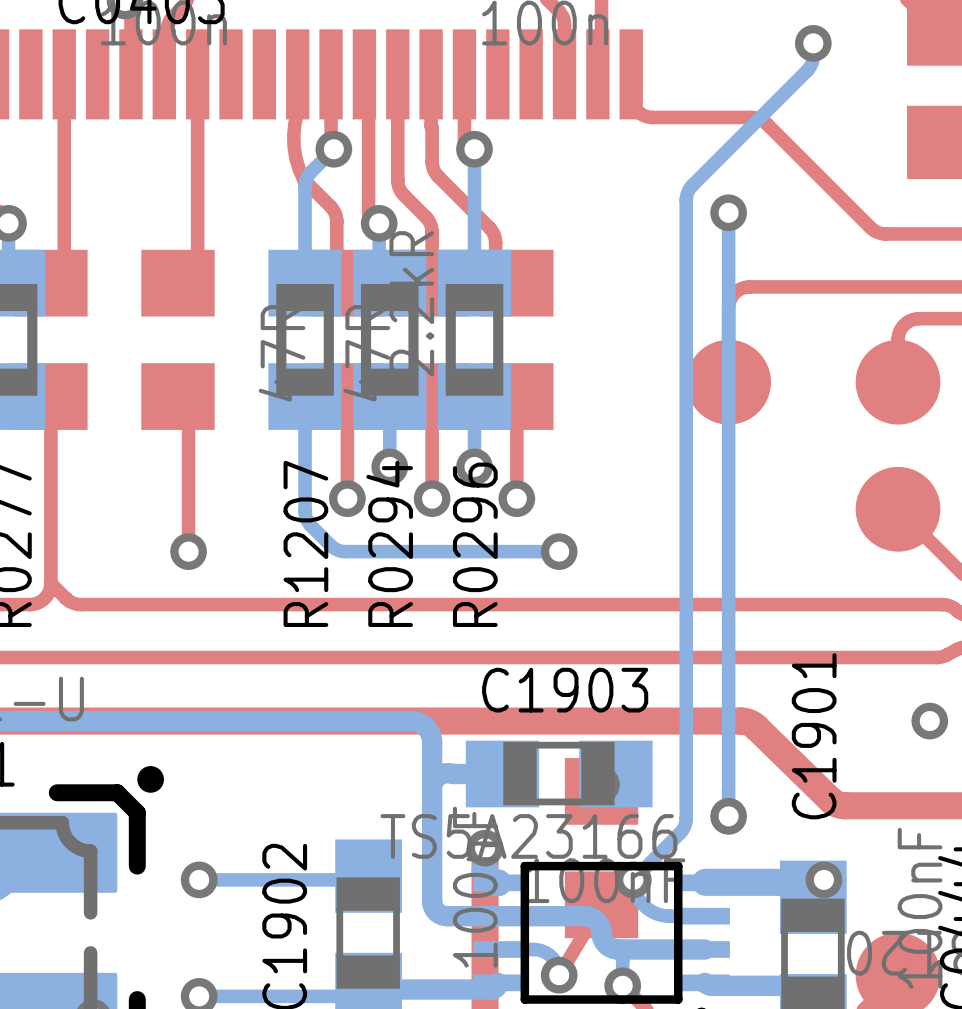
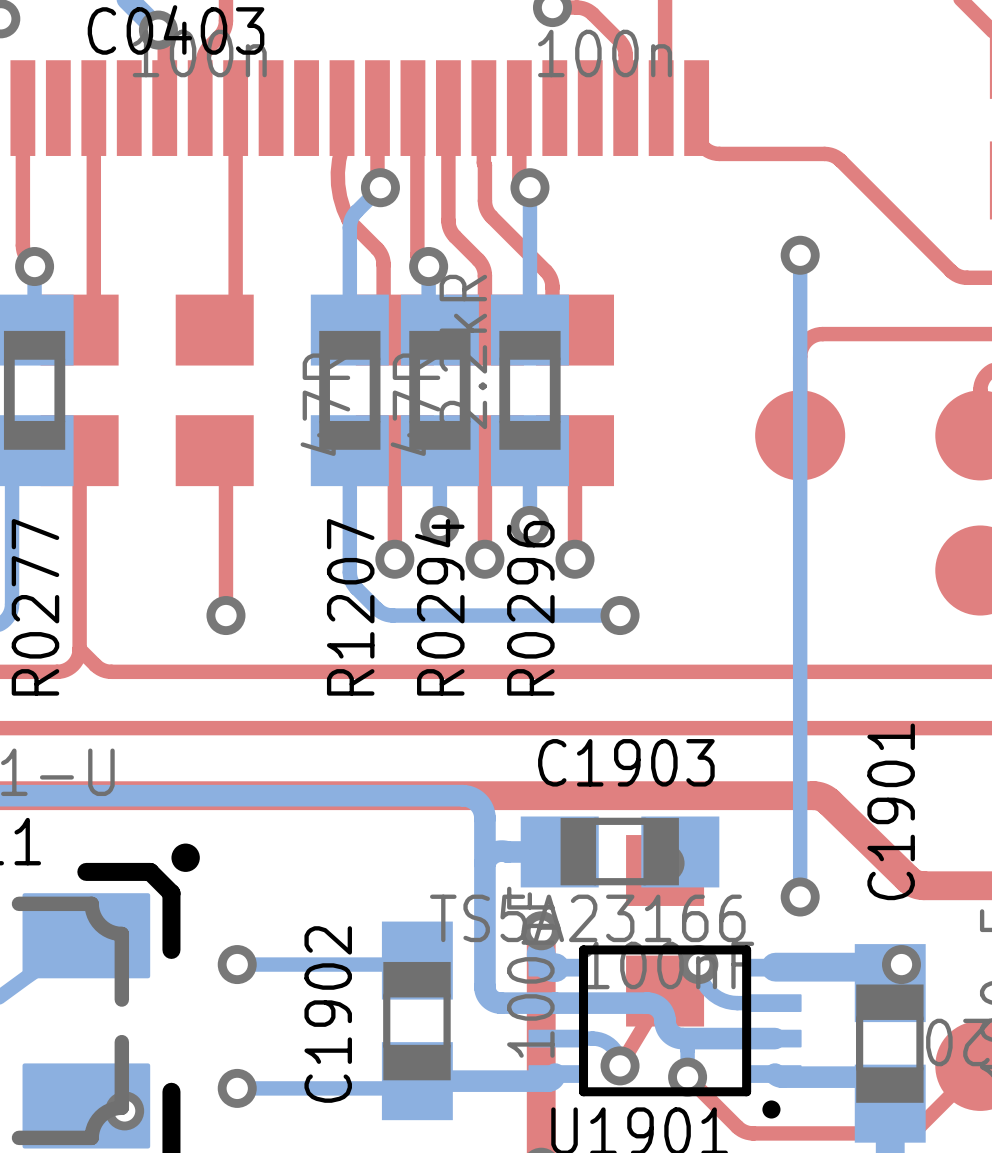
bottom track: (813, 43) (813, 58) (808, 68) (692, 185) (686, 194) (686, 820) (680, 833) (633, 879) -> none
via: (813, 43) -> none

